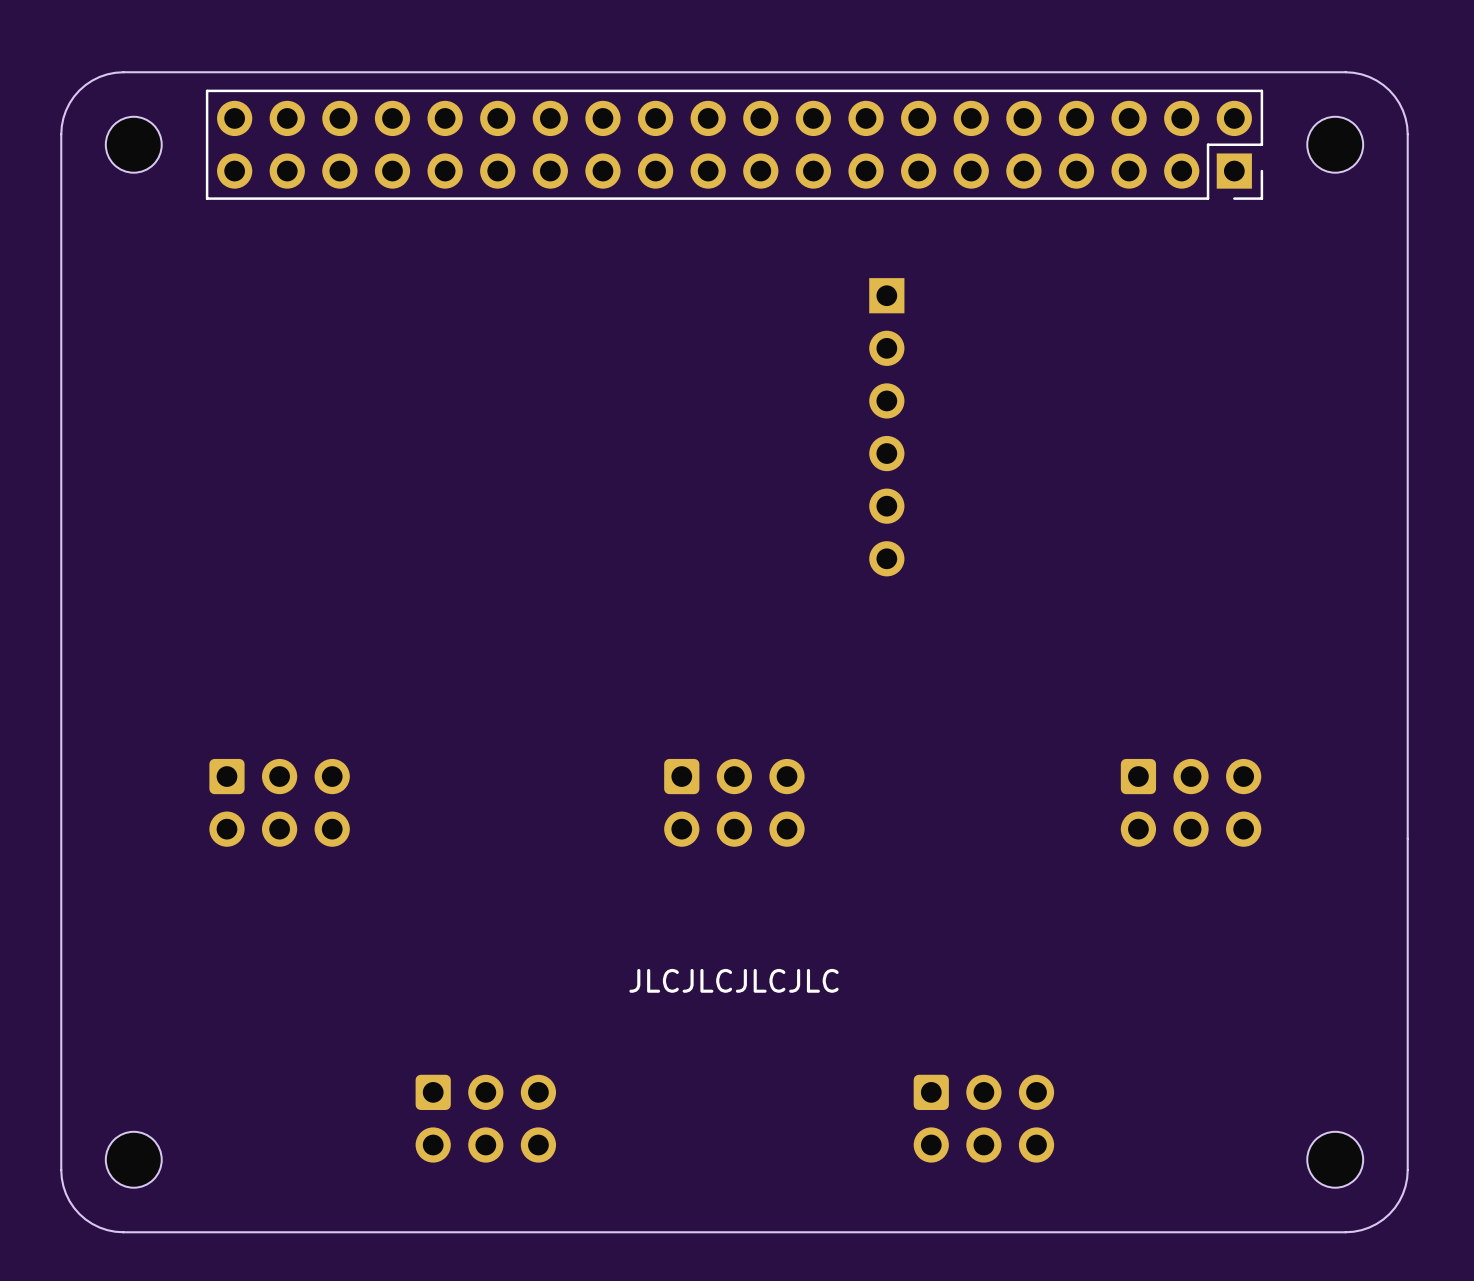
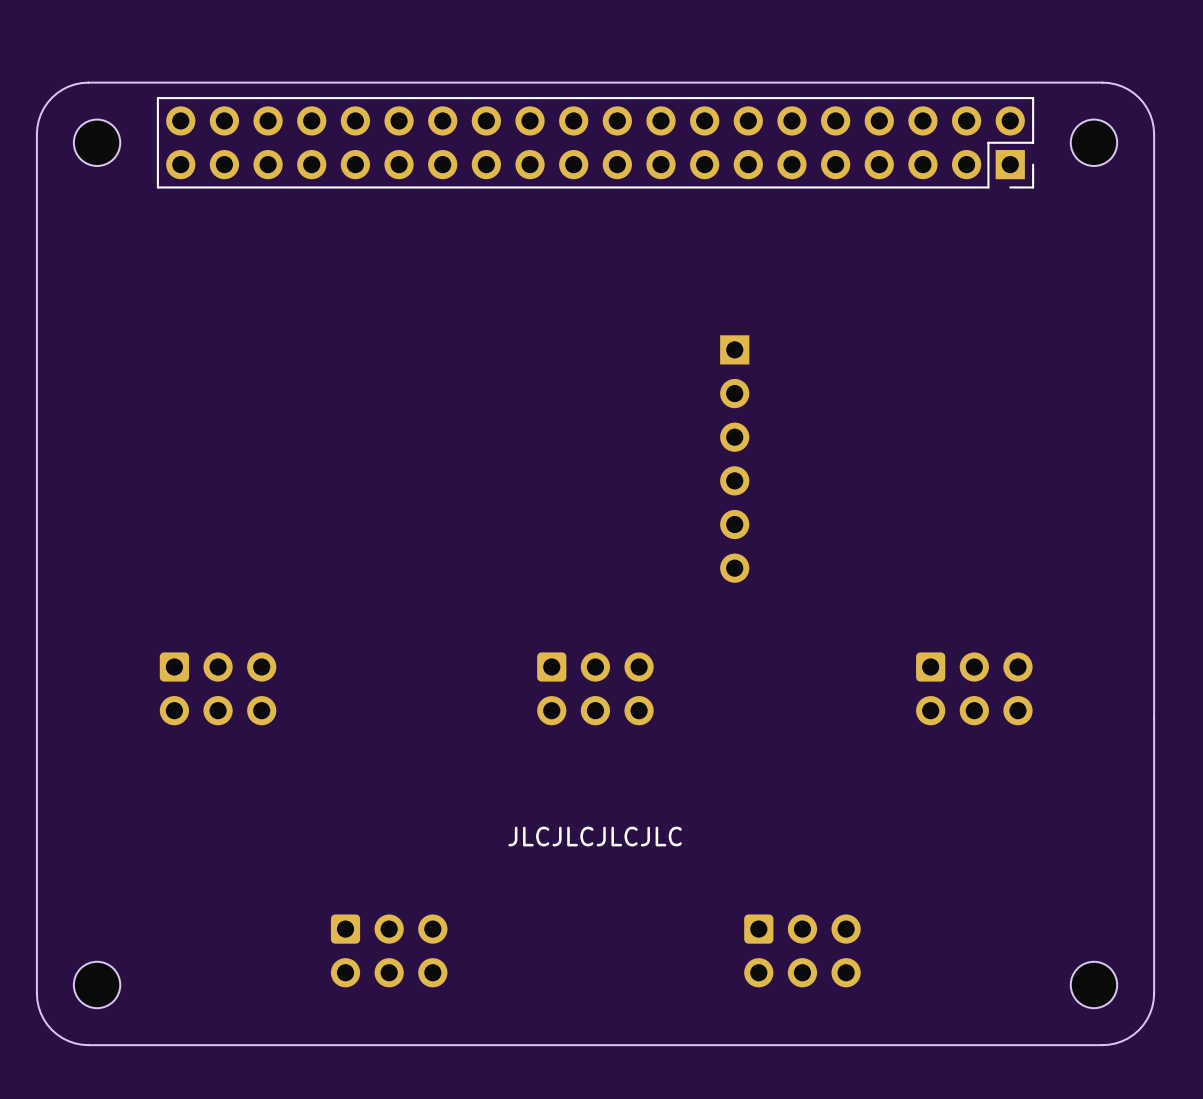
part position: (886, 427) -> (734, 459)

